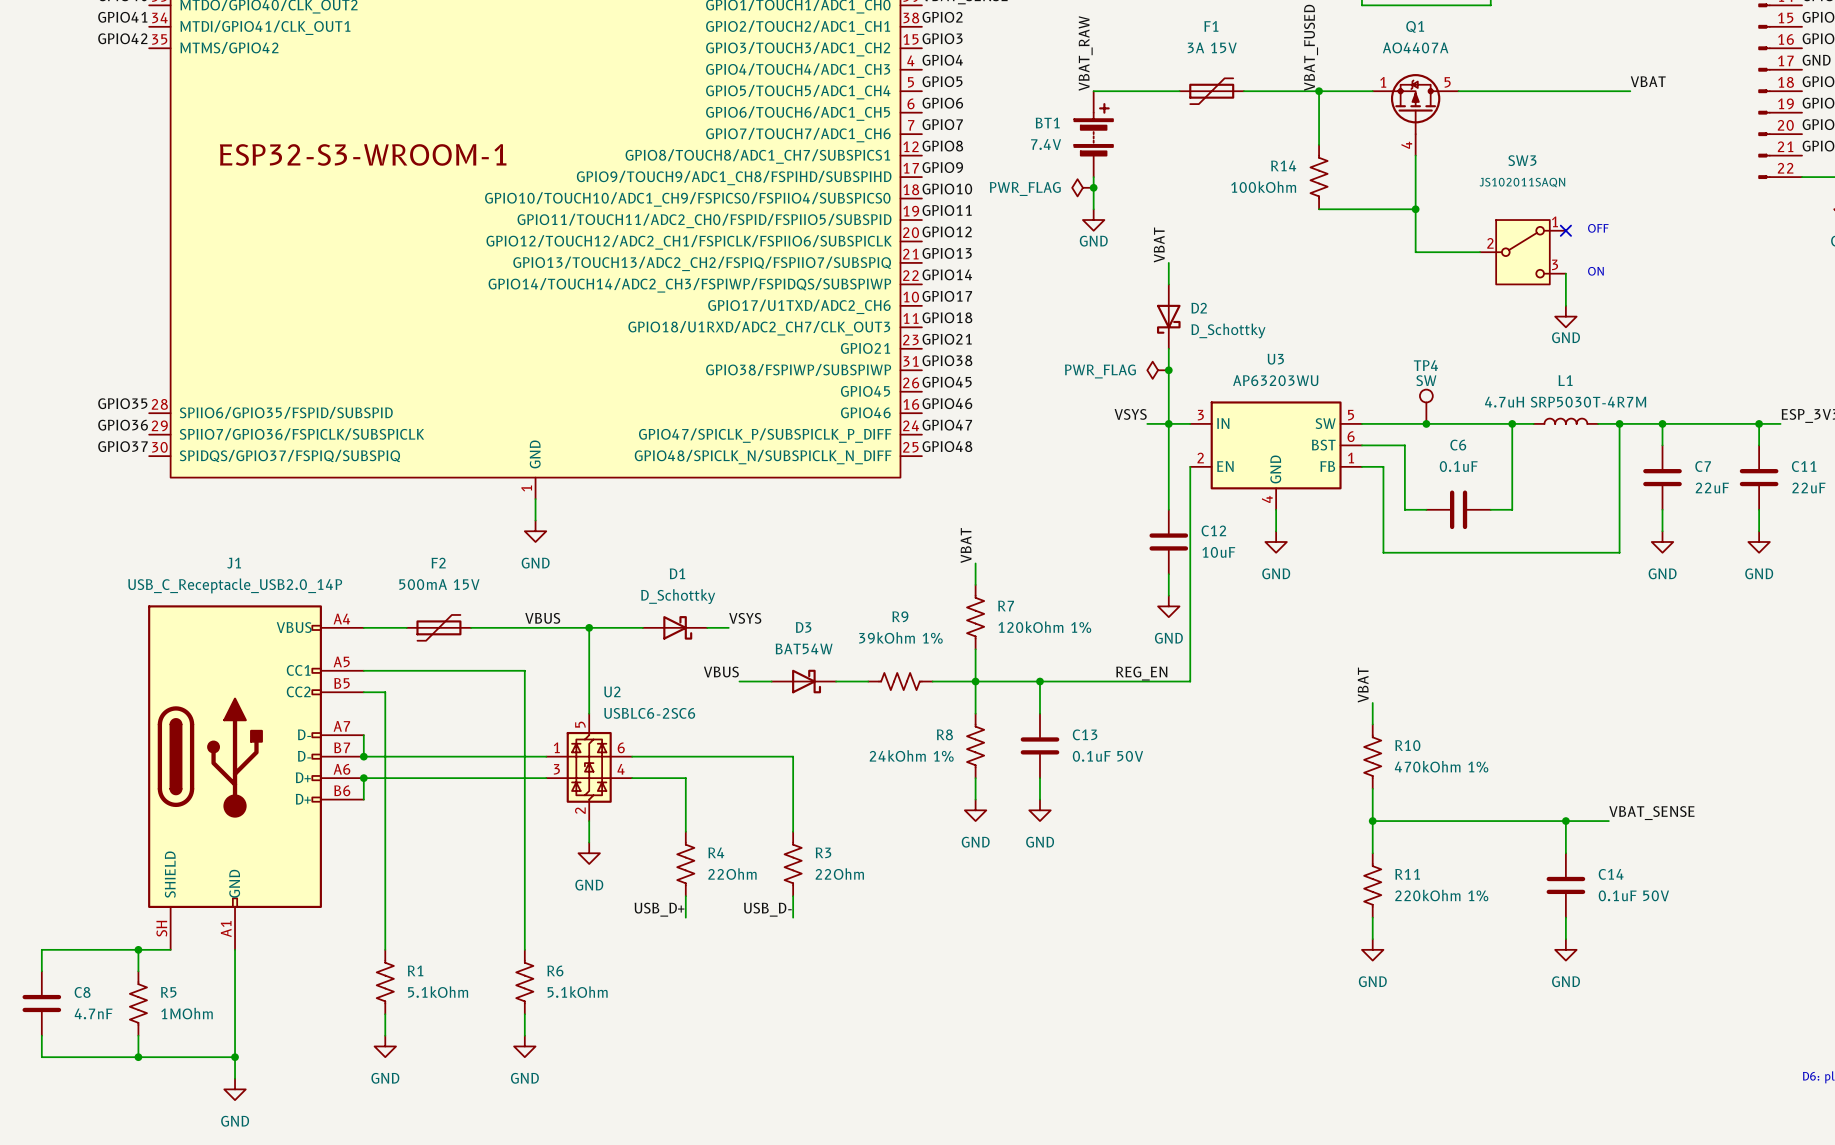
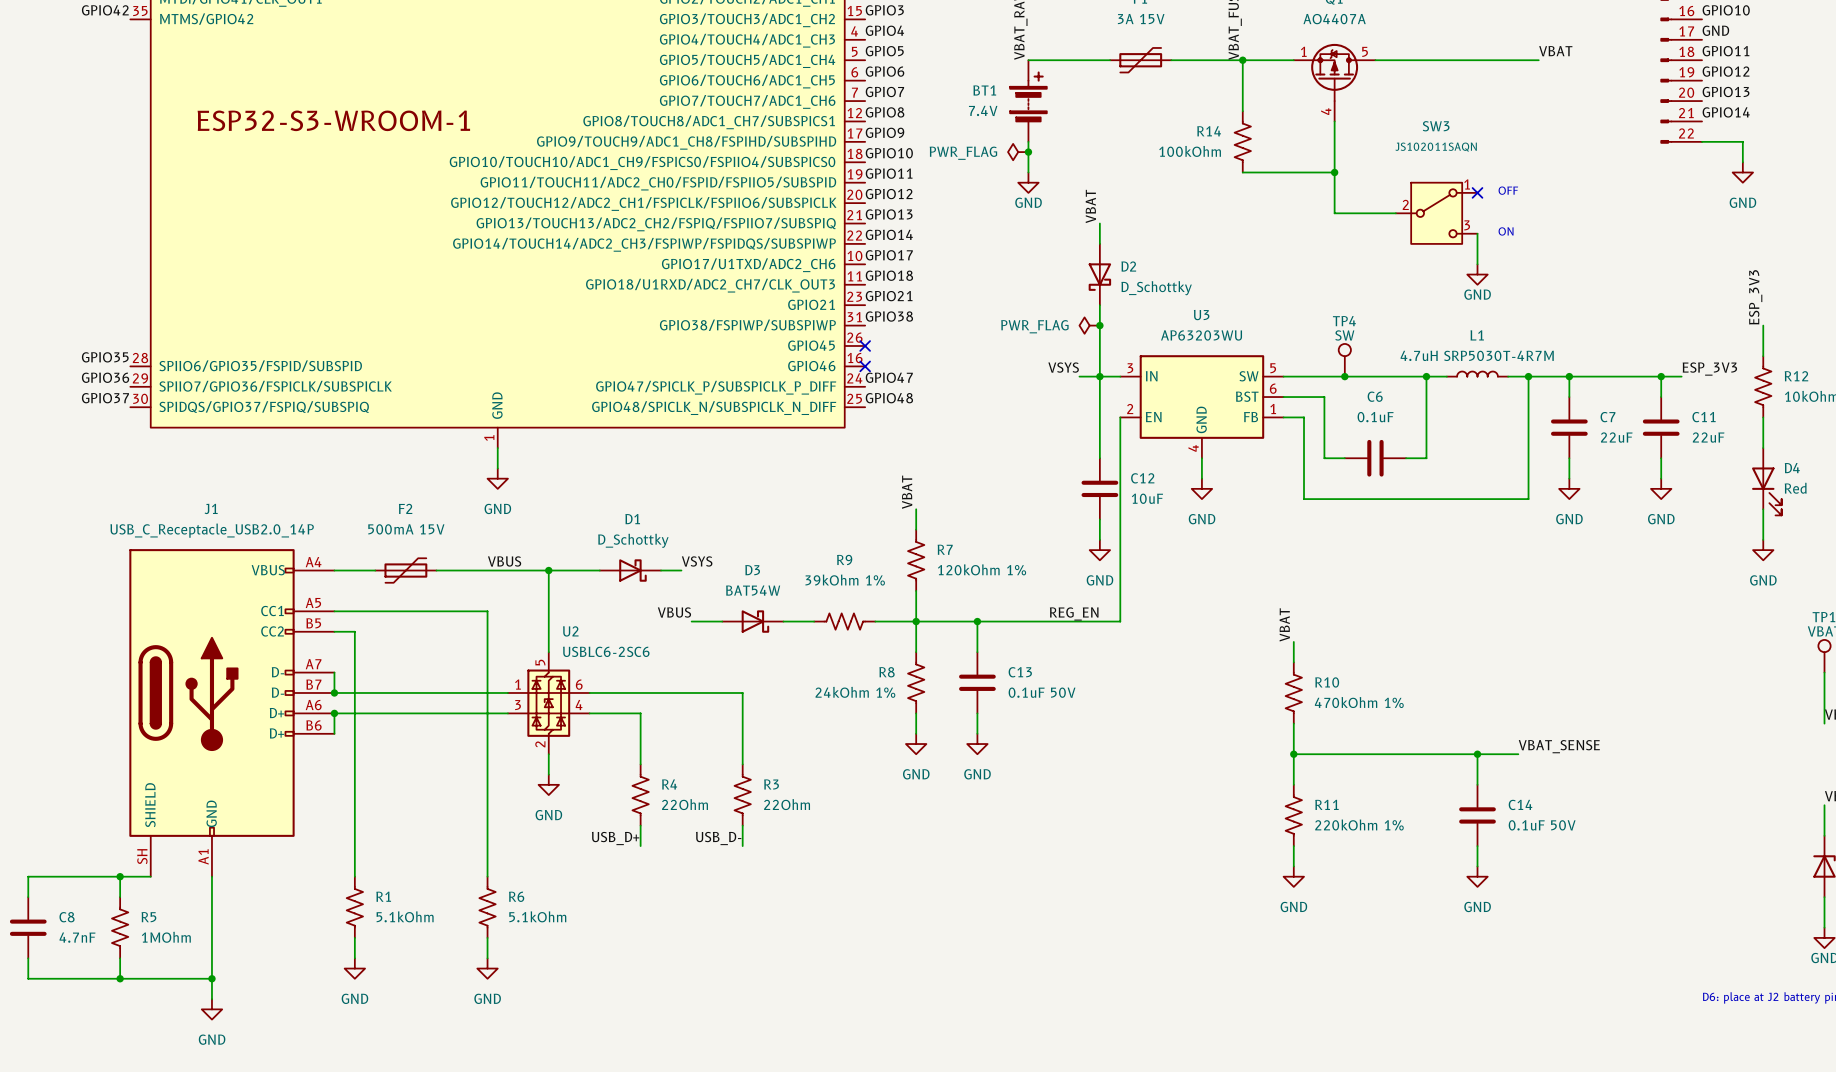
label: GPIO45 (947, 382) -> none
no-connect mark: none -> (865, 345)
label: GPIO46 (947, 403) -> none
no-connect mark: none -> (865, 366)

